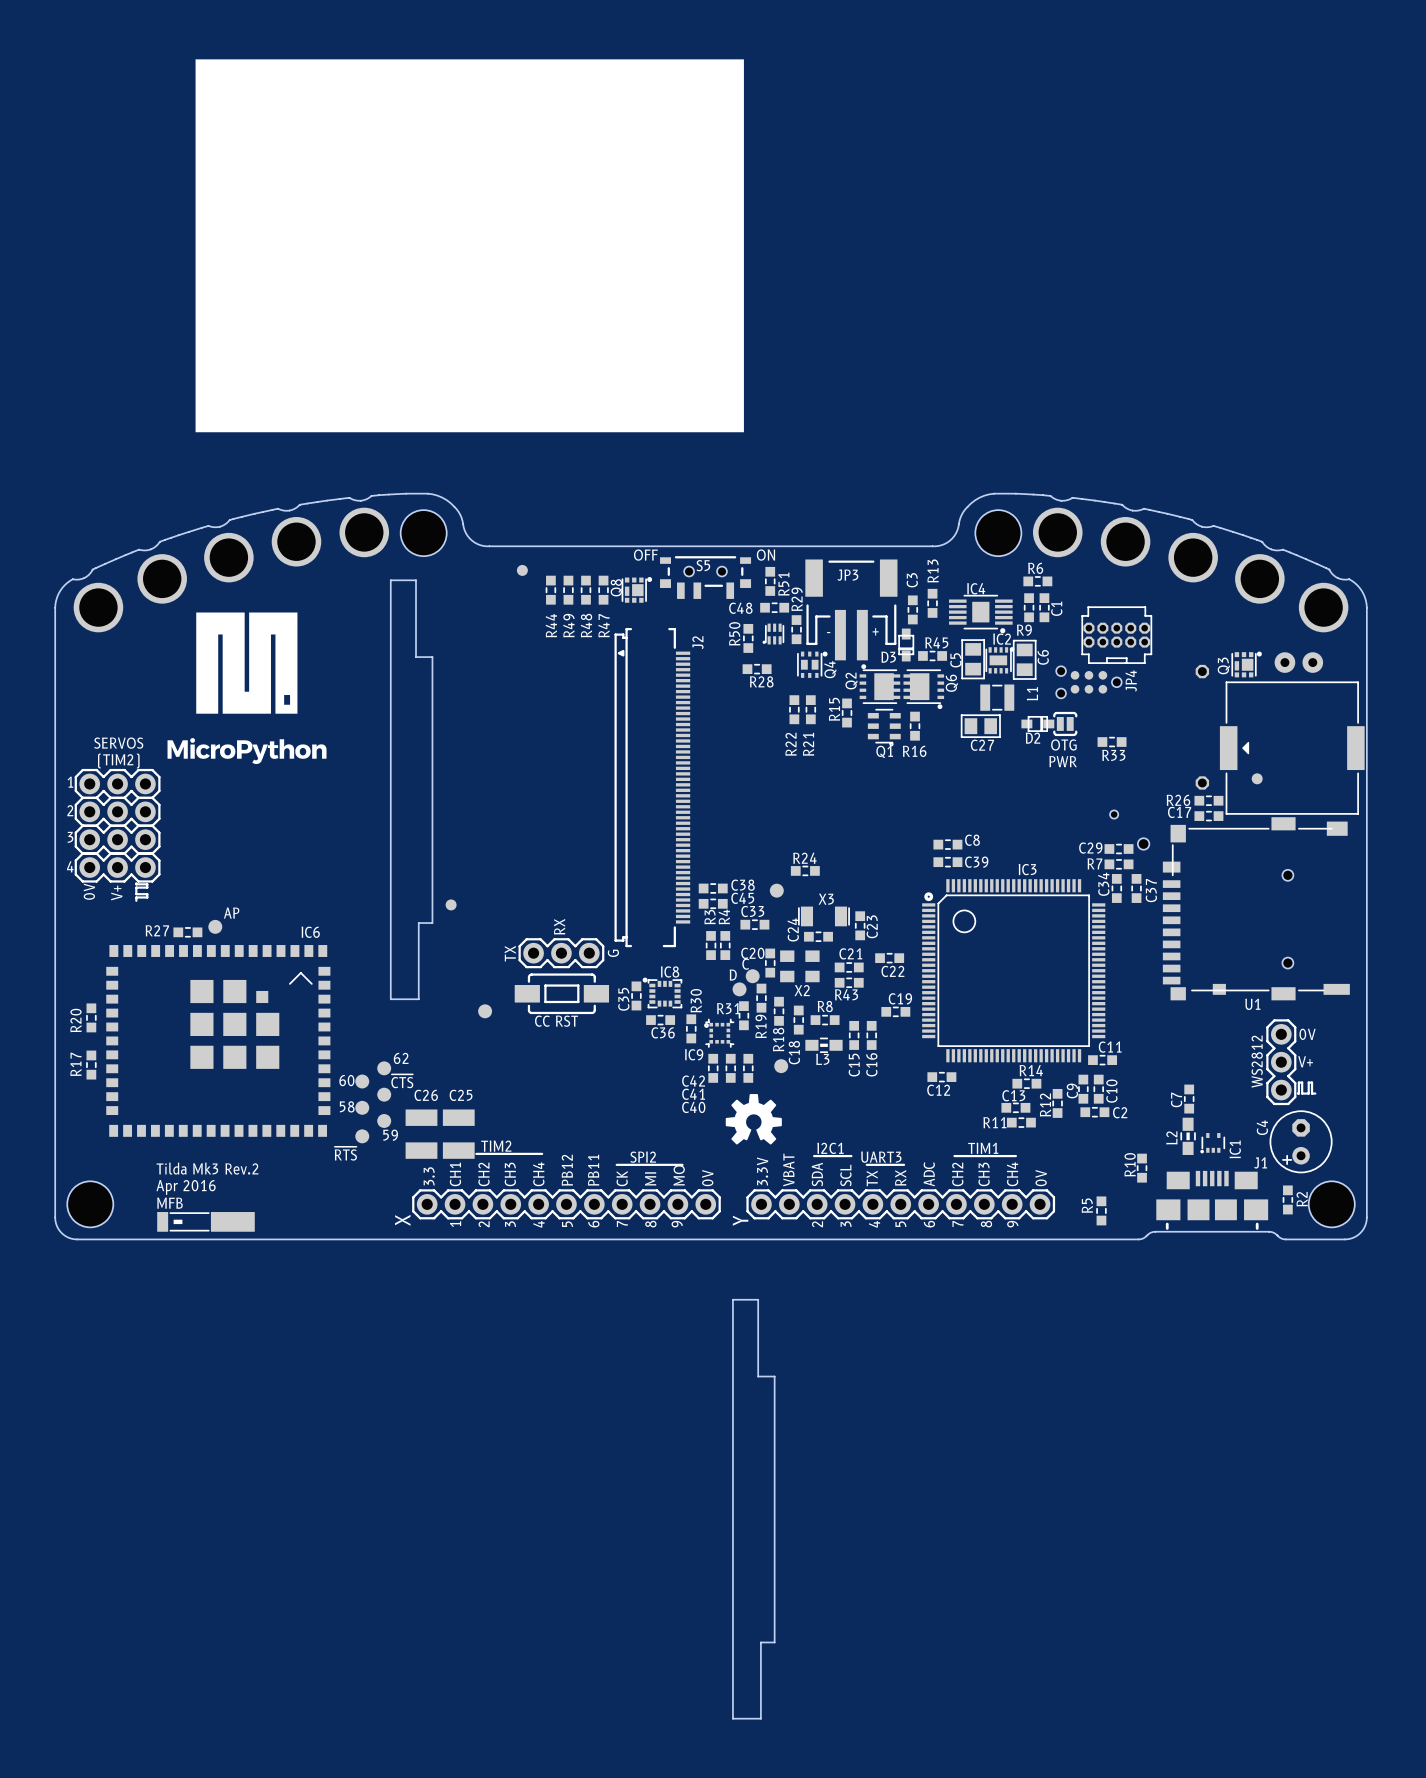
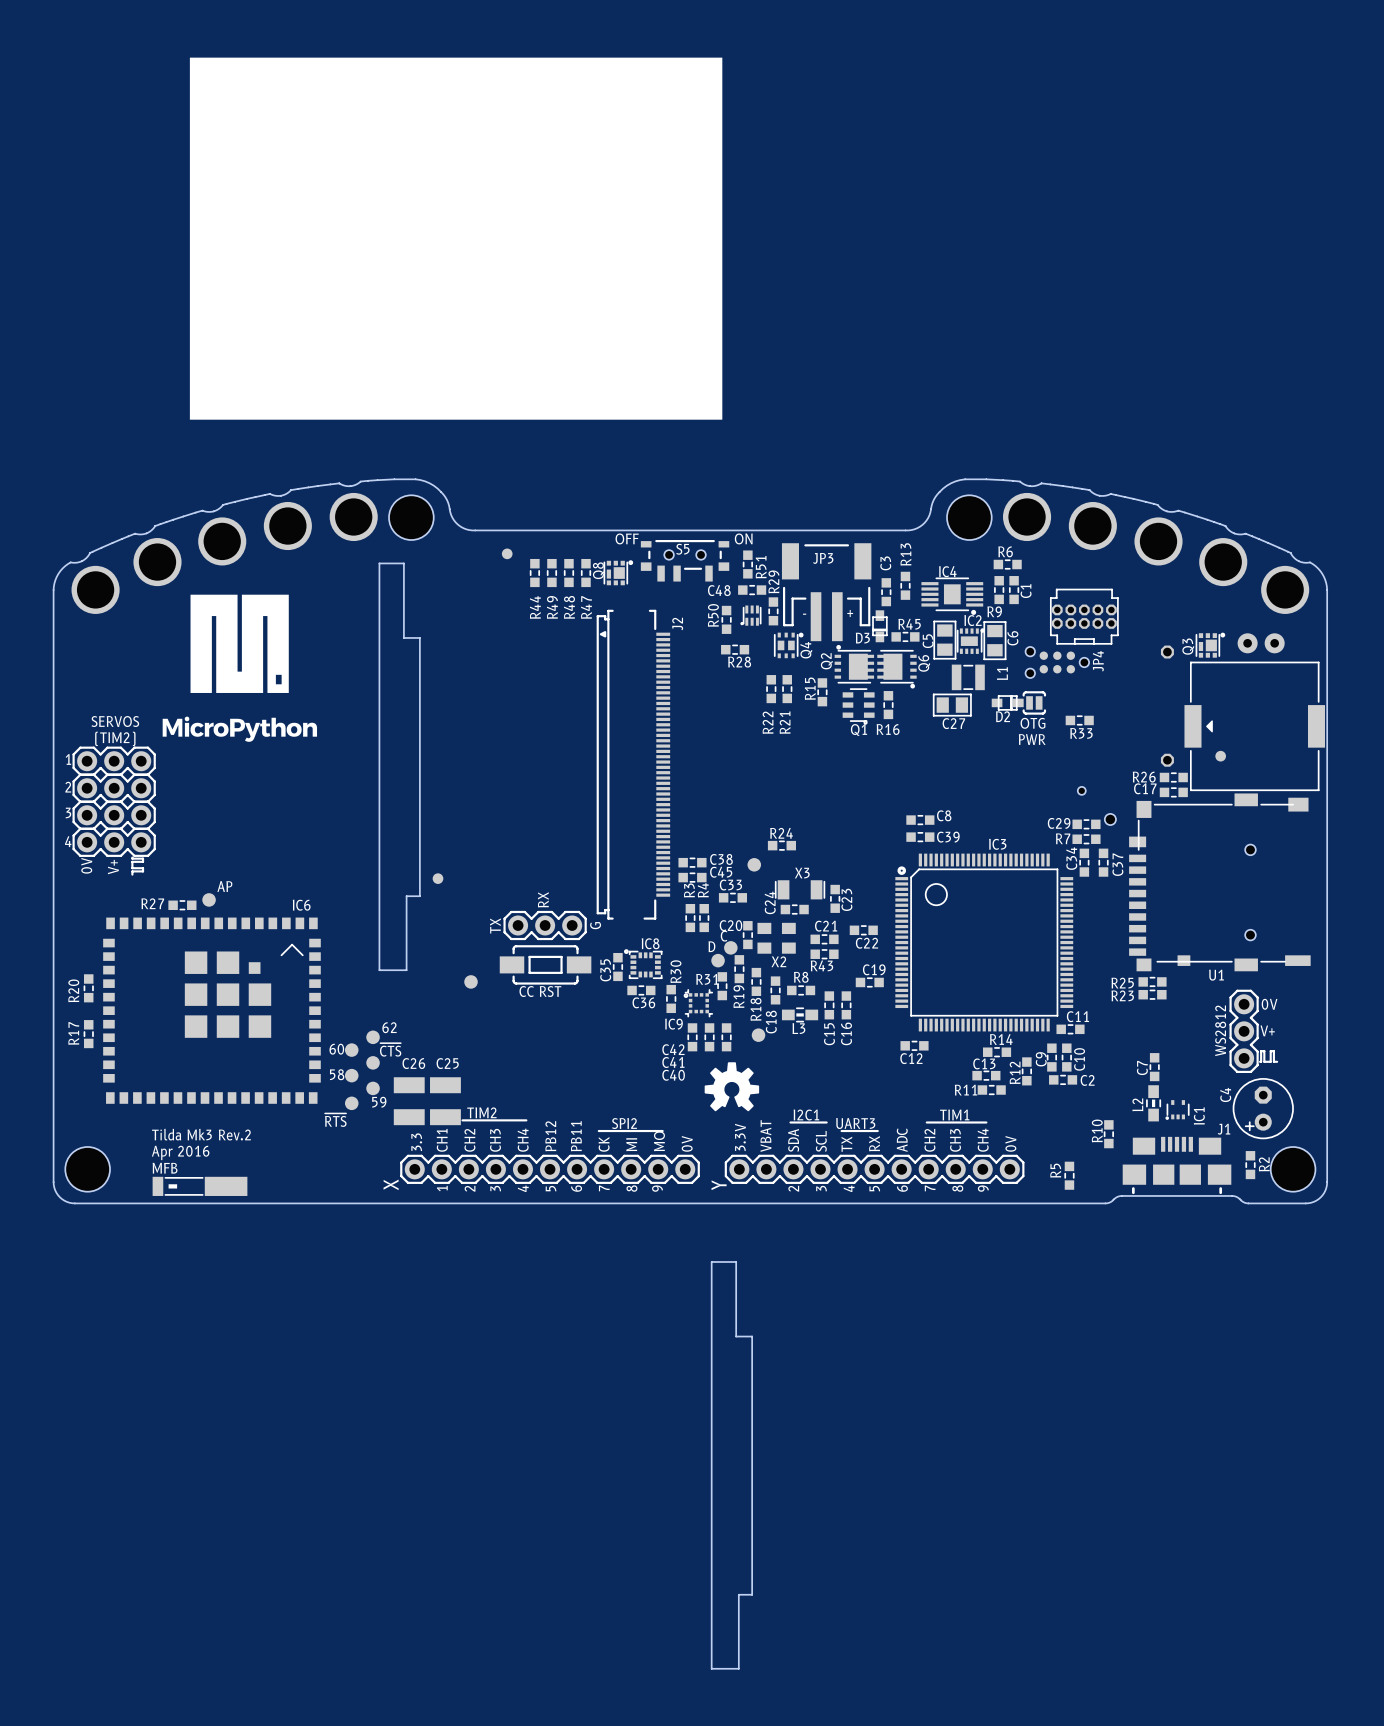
R25: none -> (1152, 981)
R23: none -> (1152, 994)

